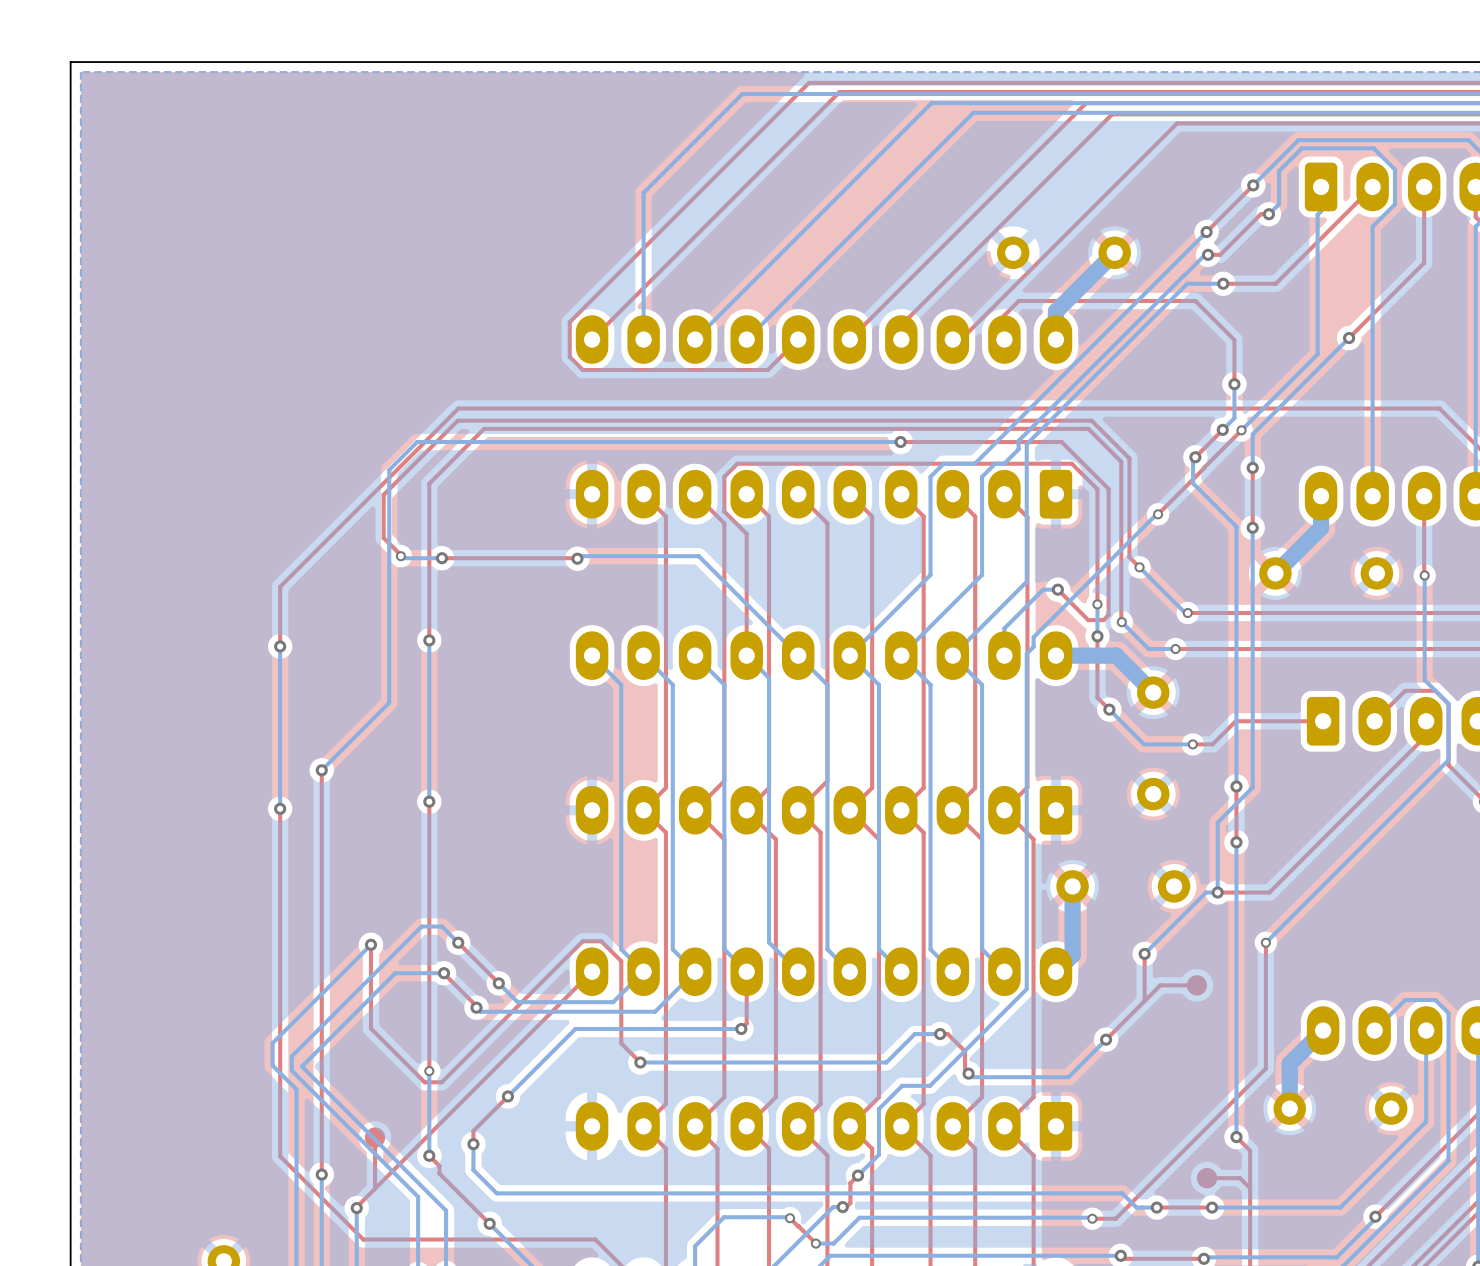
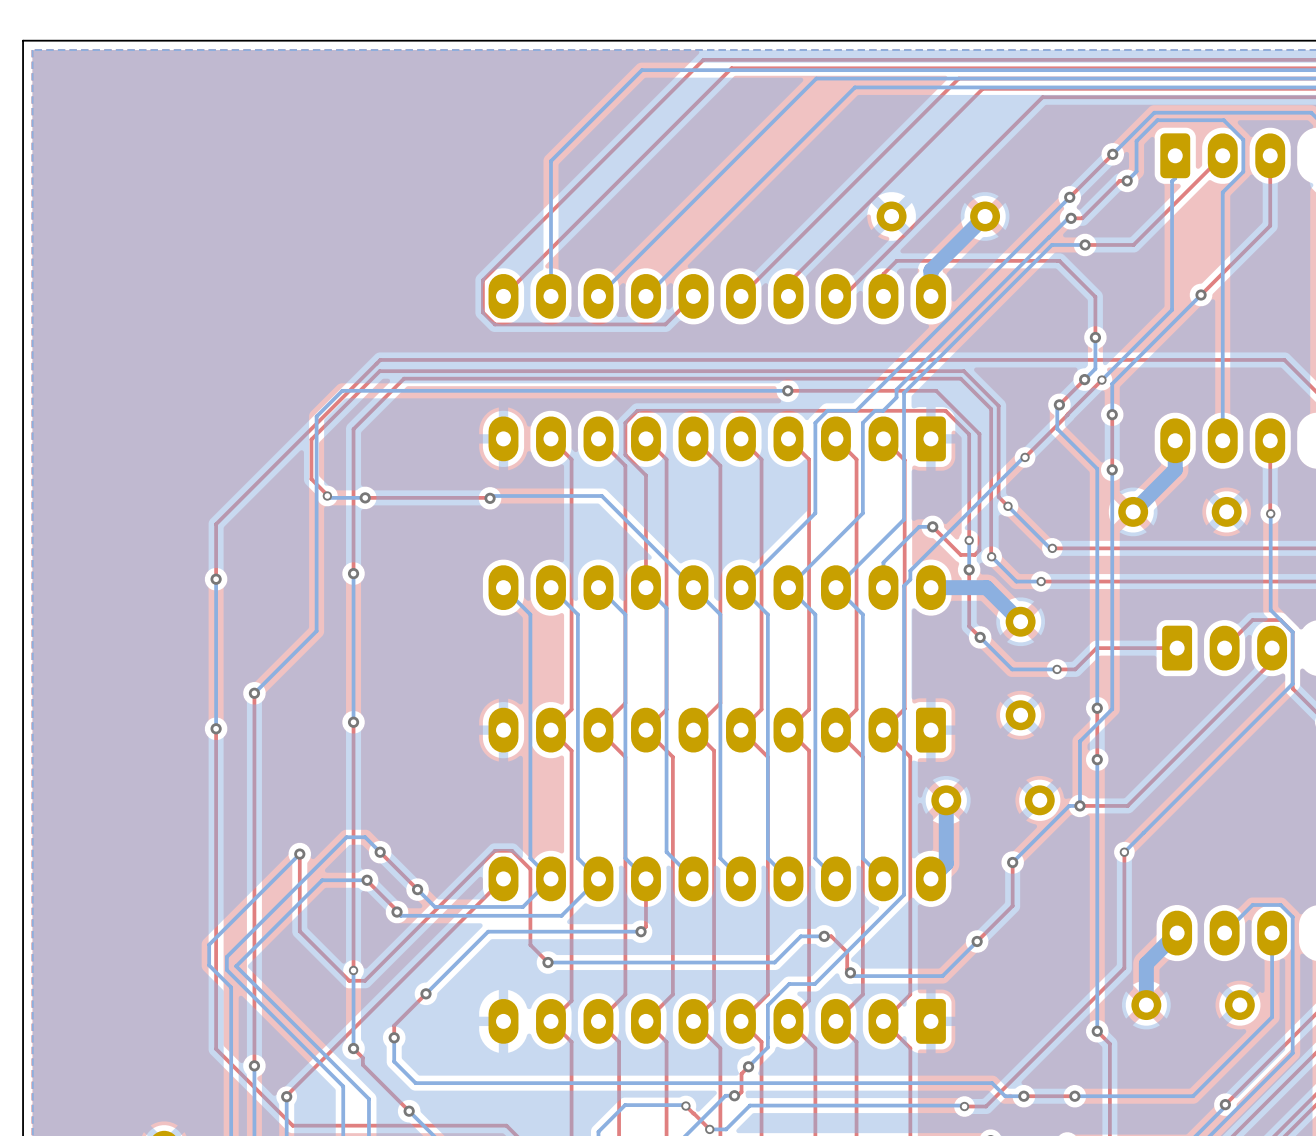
top track: (1196, 985) (1160, 985) (1144, 1001) -> none
top track: (375, 1137) (375, 1188) -> none
part: (375, 1137) -> none
top track: (1207, 1178) (1240, 1178) (1250, 1188) -> none

